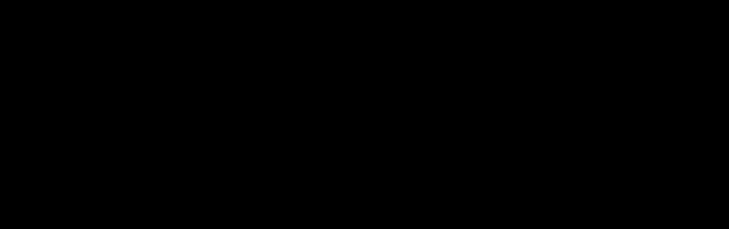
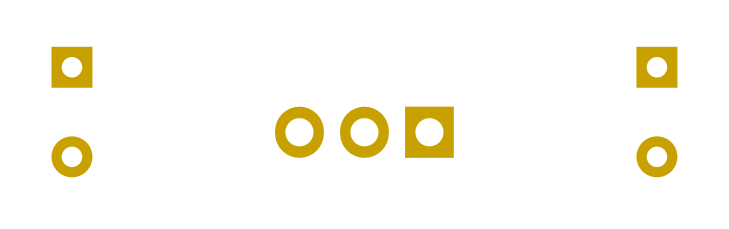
part: none -> (71, 112)
part: none -> (656, 112)
part: none -> (364, 132)

